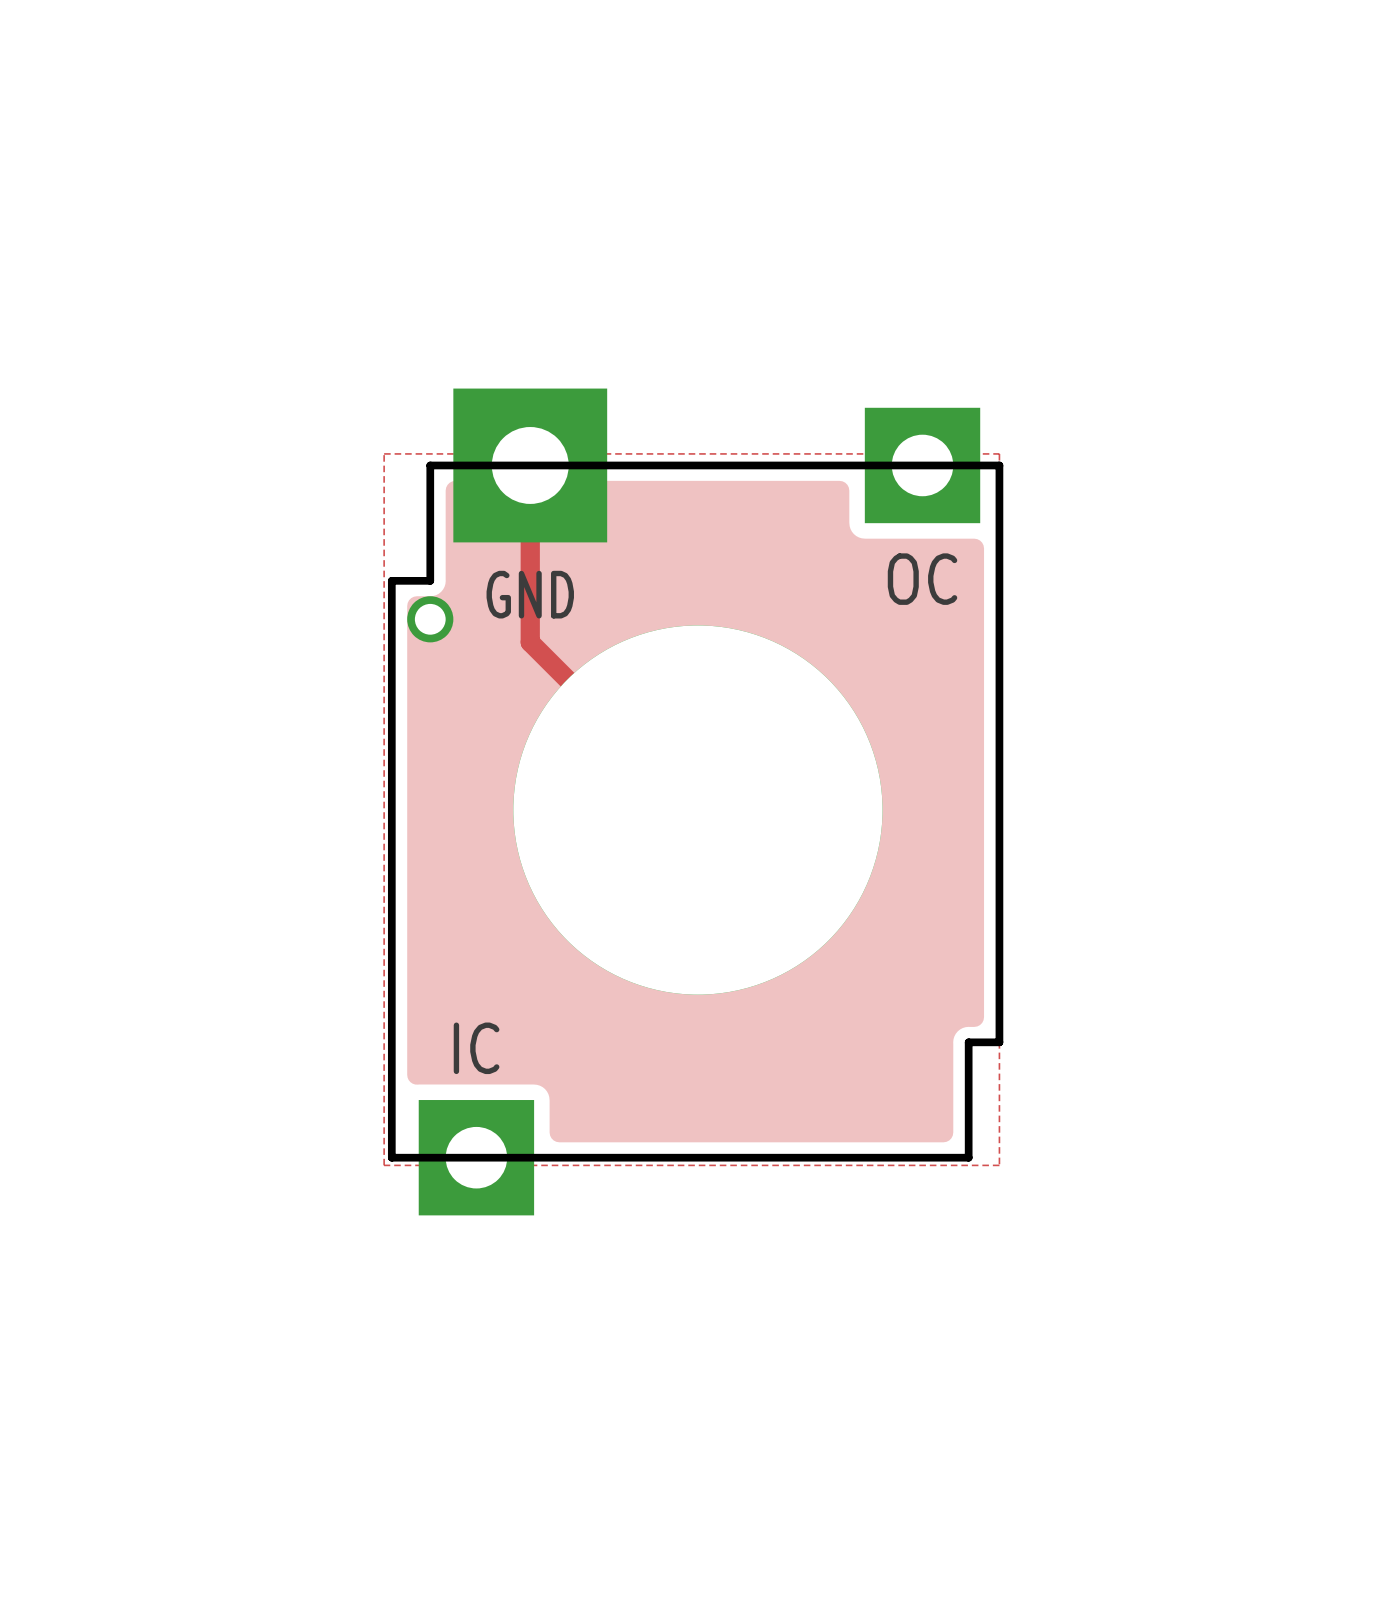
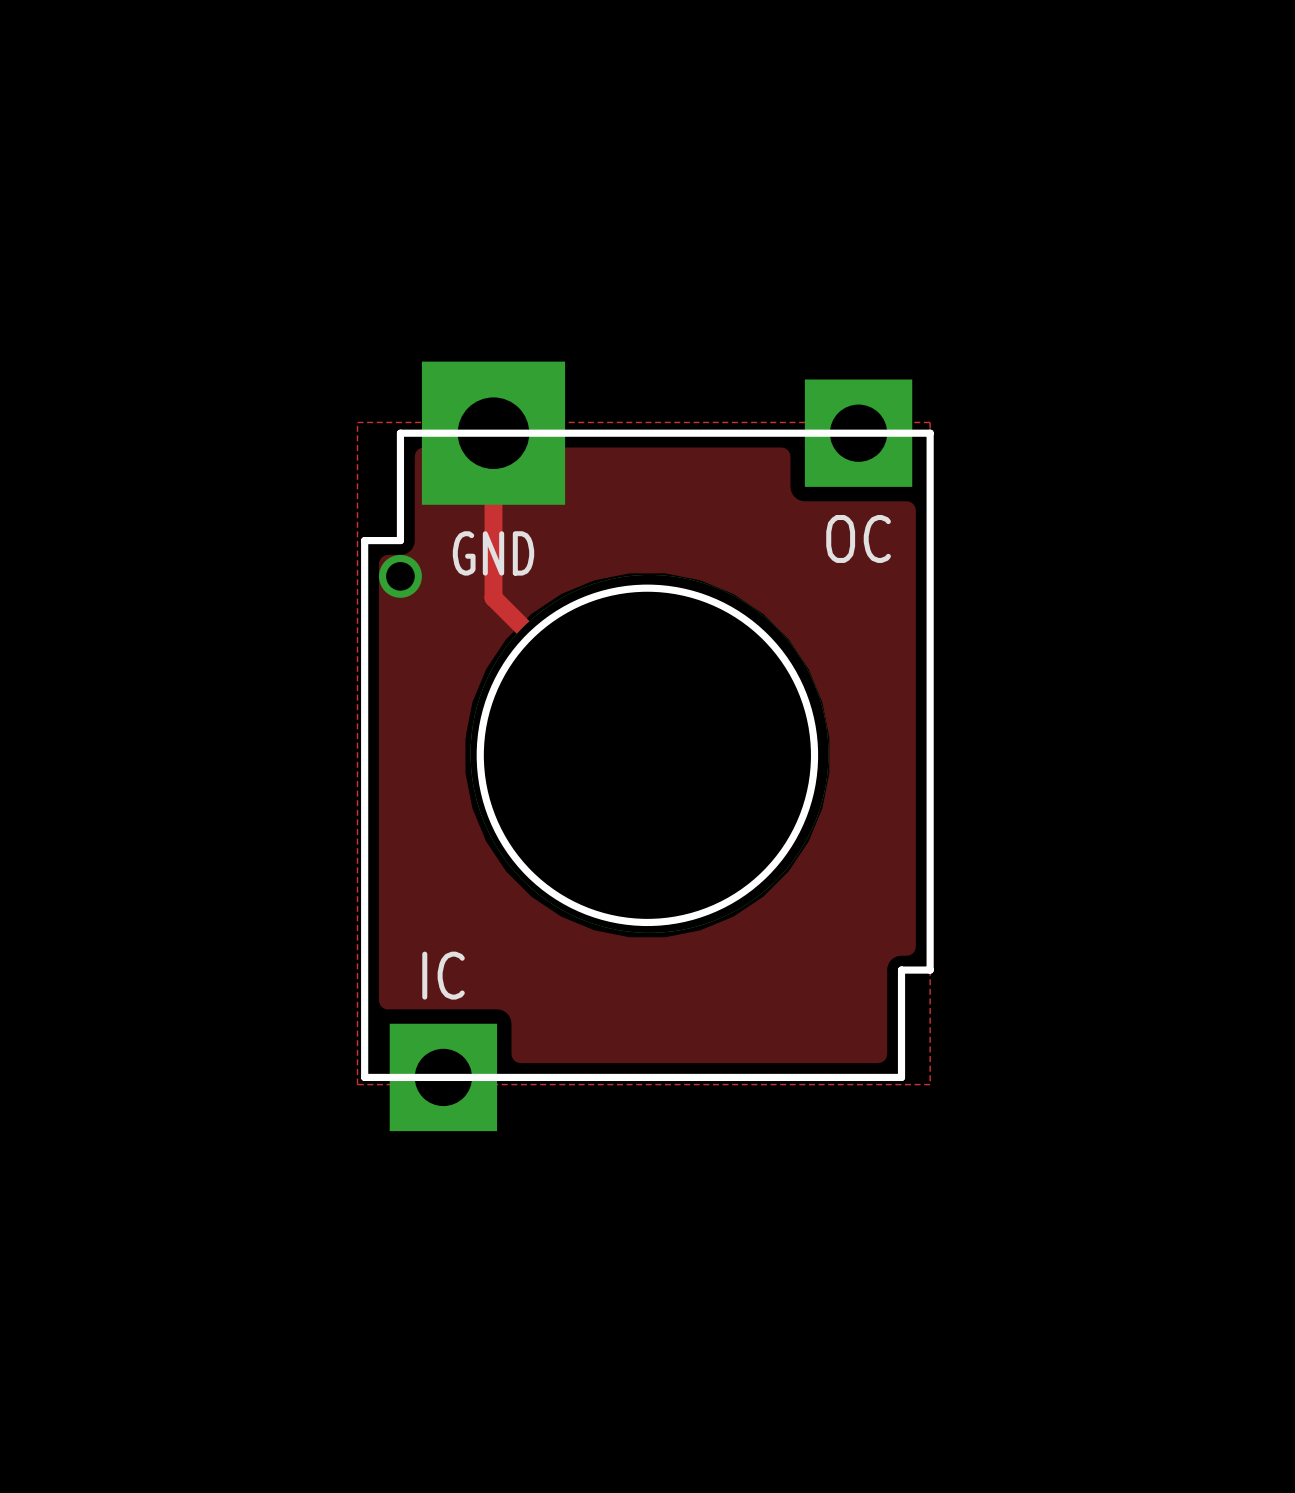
part footprint: [513, 625, 883, 995] -> [470, 574, 829, 933]
round board edge: none -> [476, 584, 819, 927]

